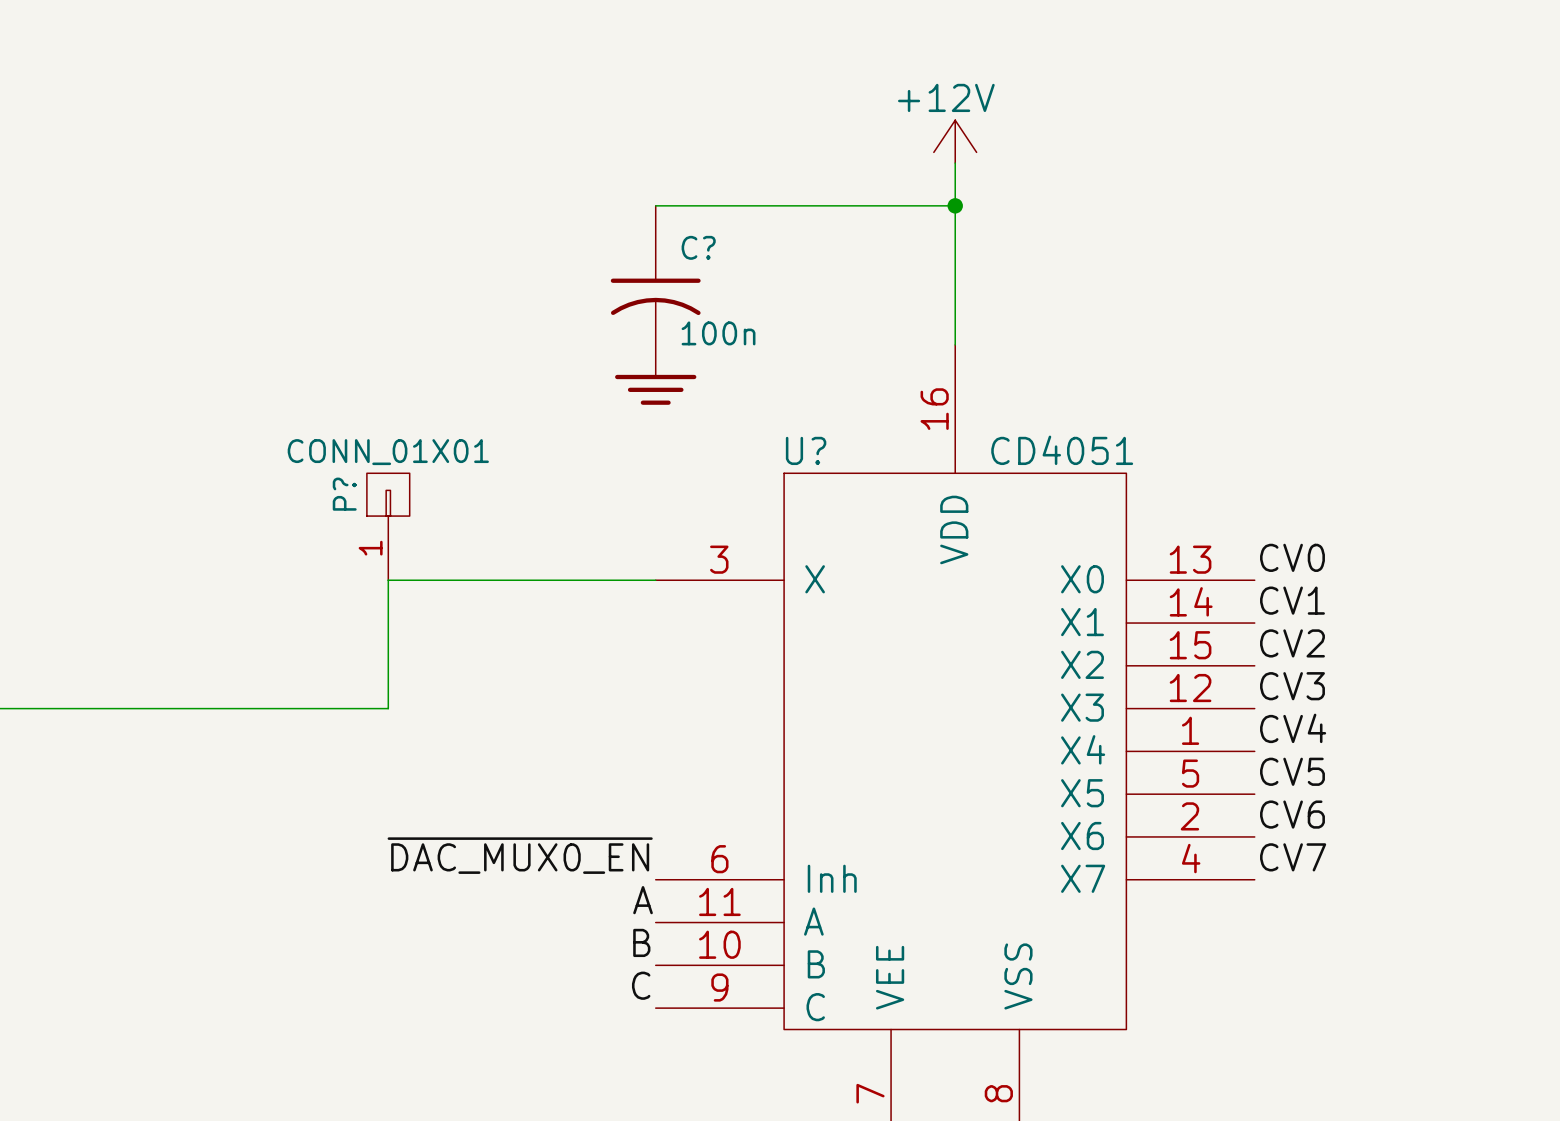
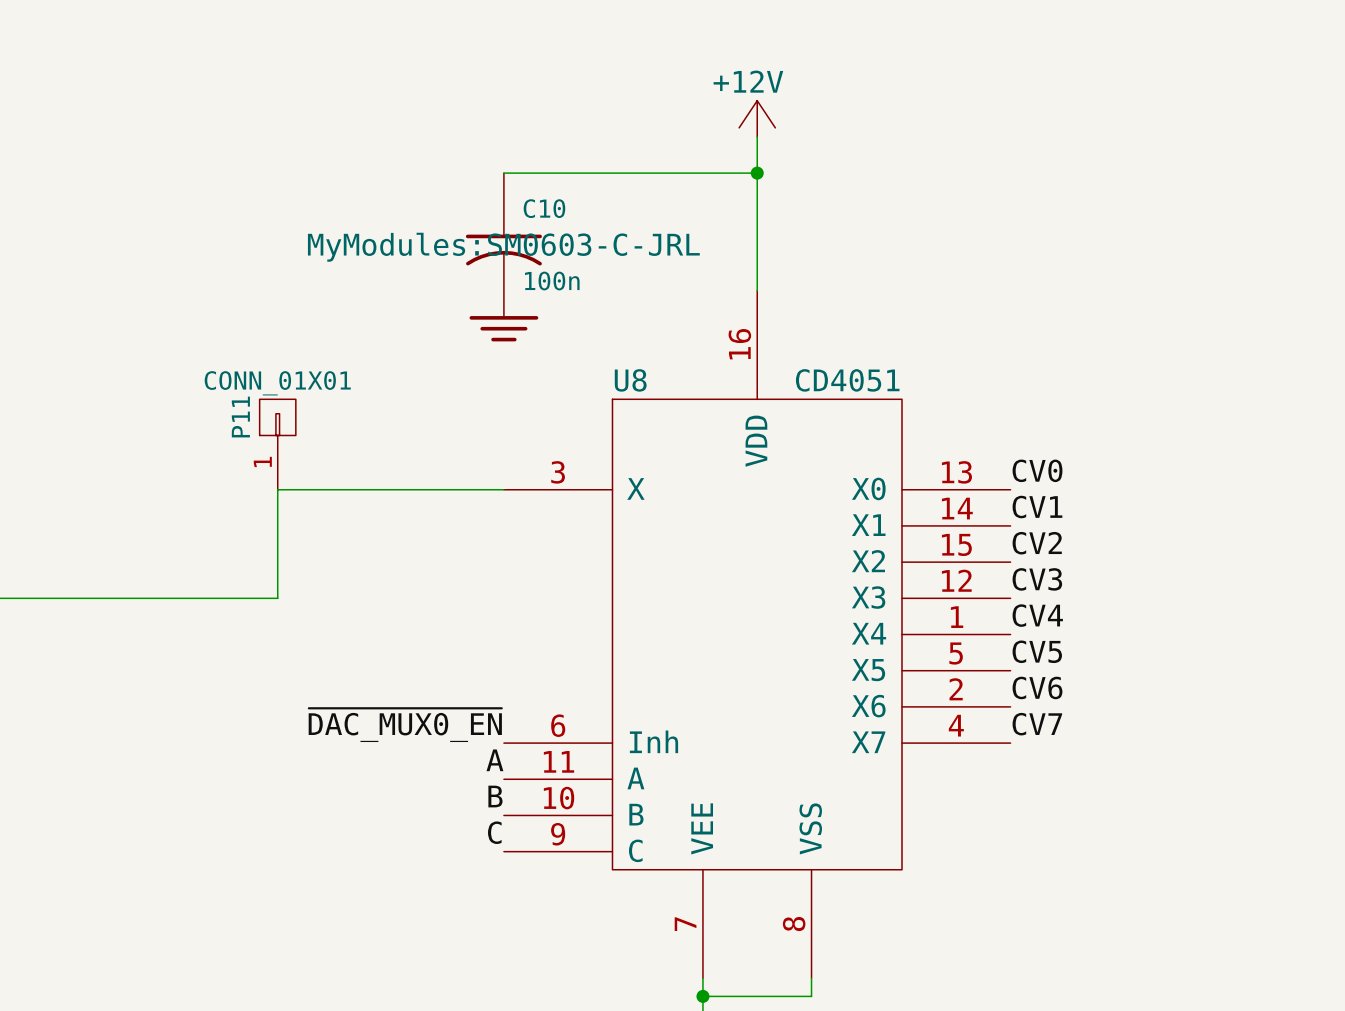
C? name: C? (698, 247) -> C10 (544, 208)
C? text: none -> MyModules:SM0603-C-JRL (503, 247)
U? name: U? (806, 450) -> U8 (630, 380)
P? name: P? (344, 494) -> P11 (240, 417)

